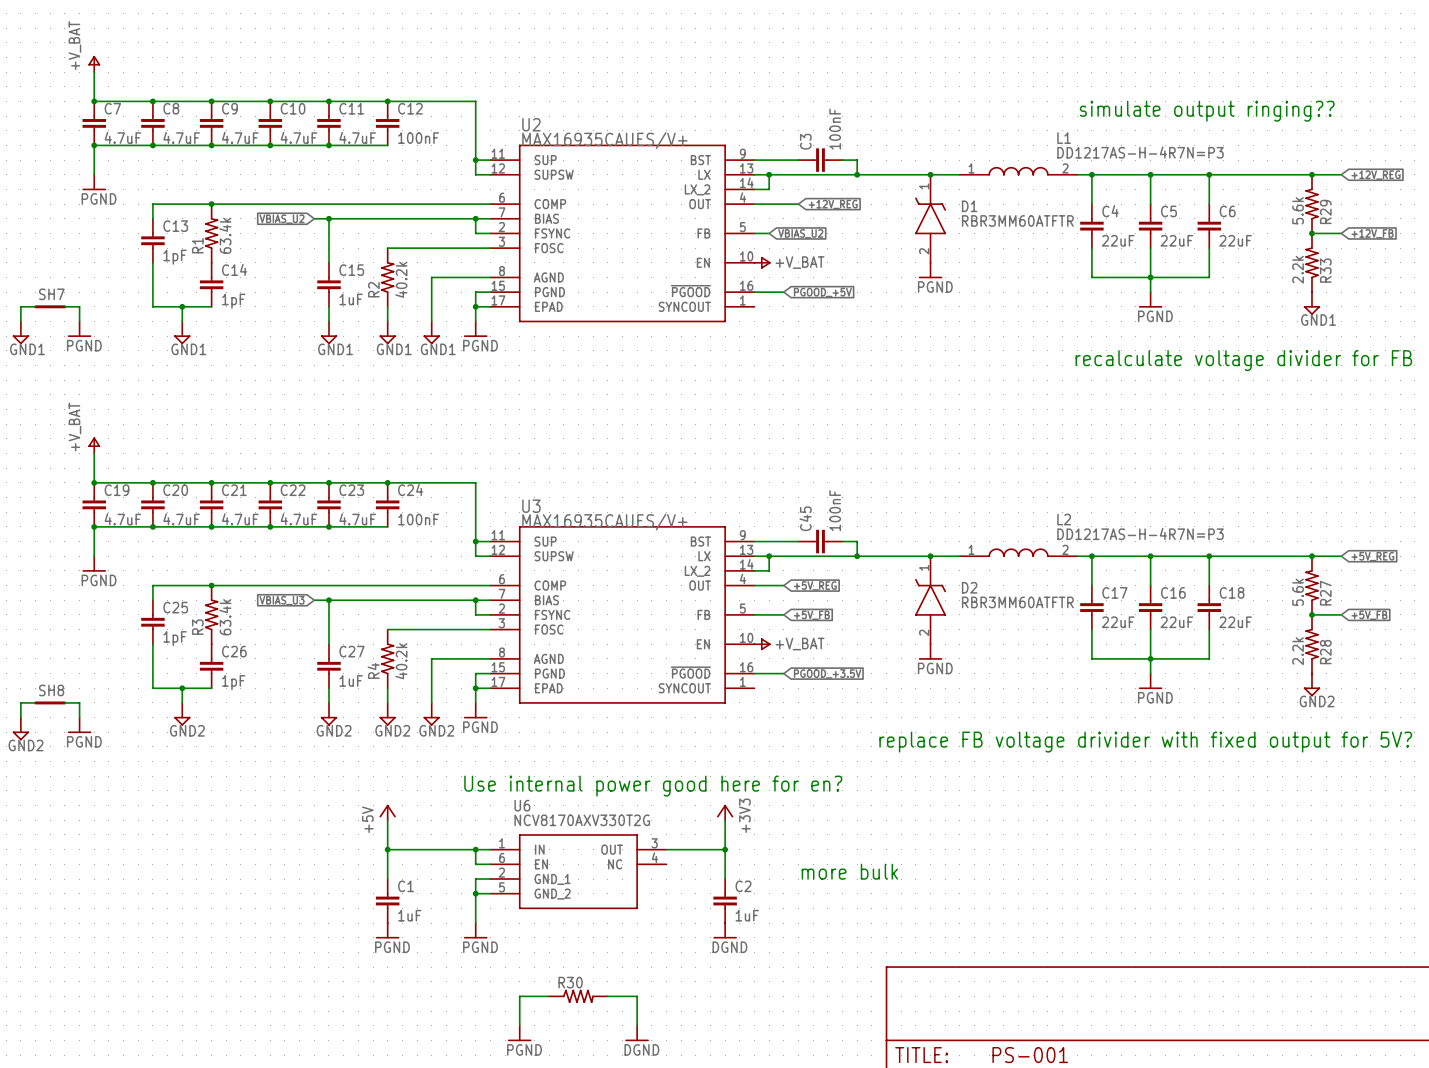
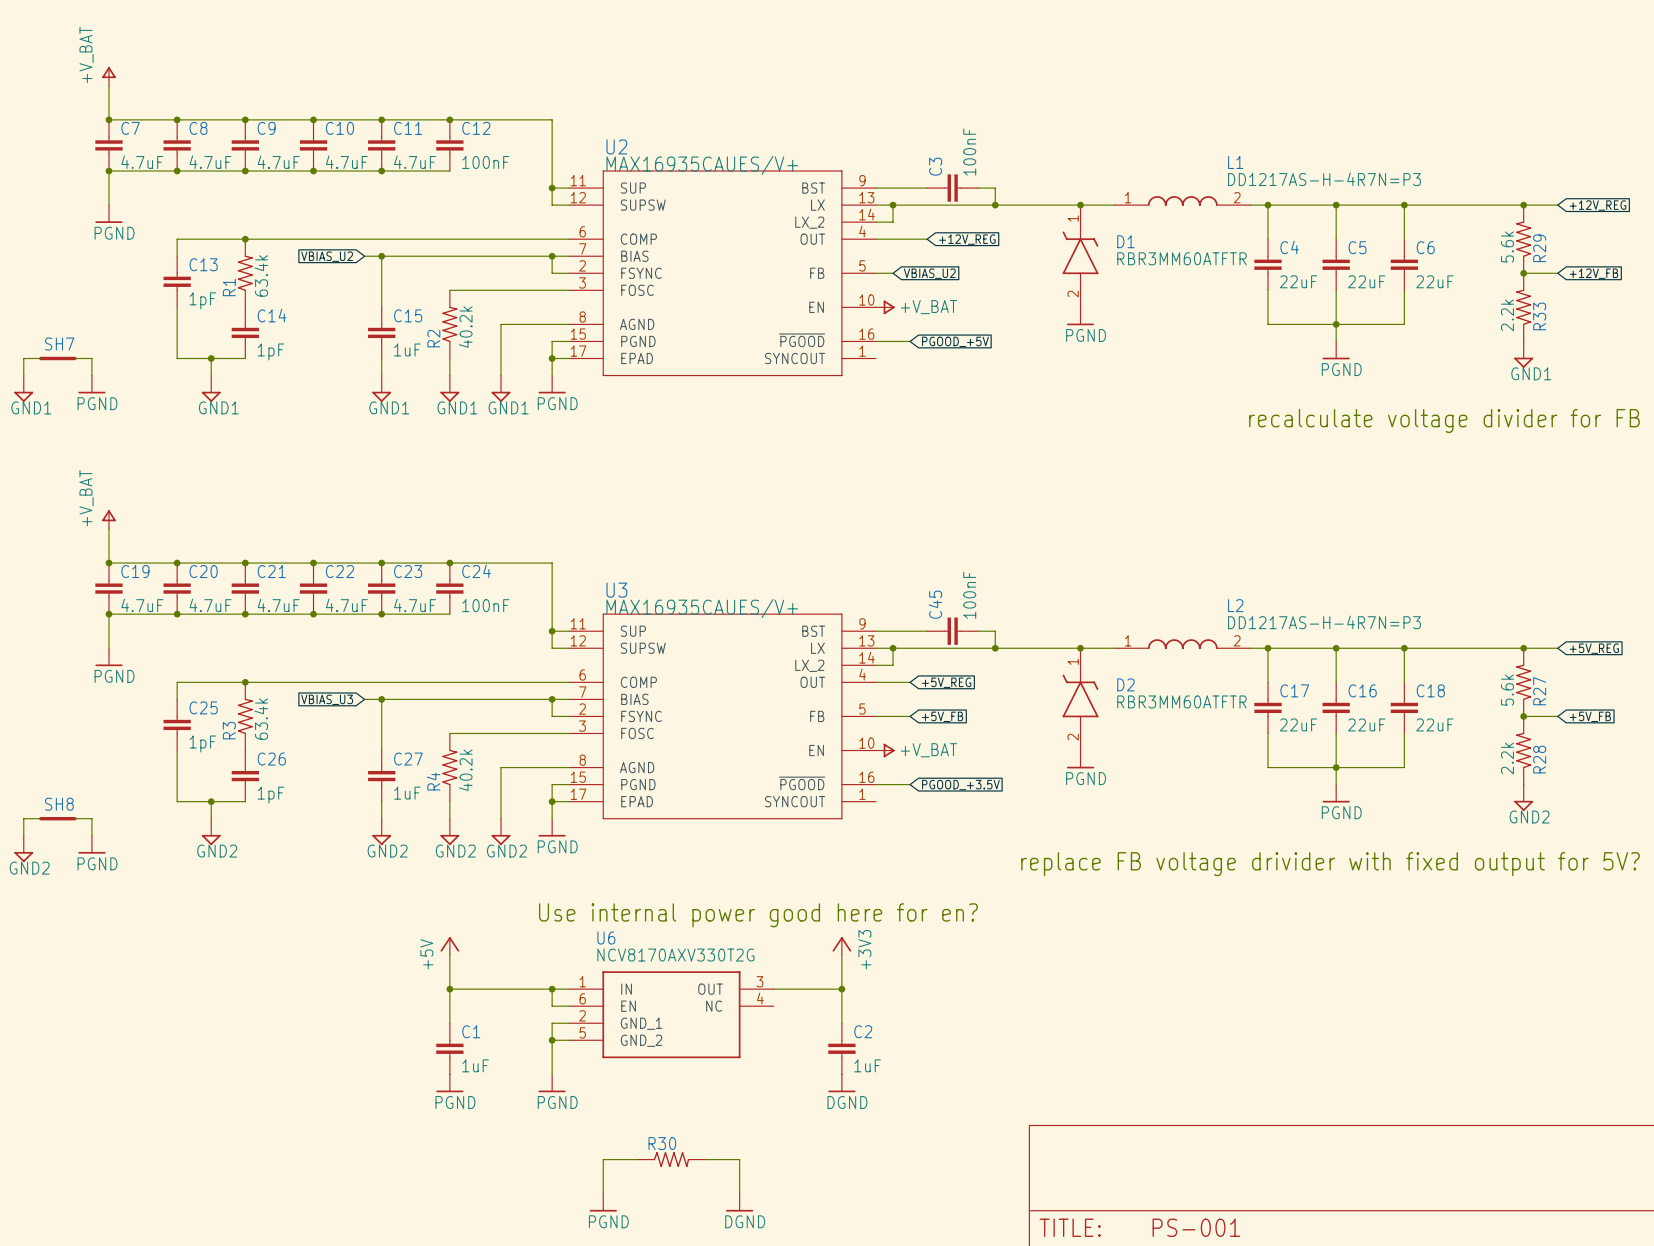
text: simulate output ringing?? (1207, 111) -> none
text: more bulk (849, 871) -> none

